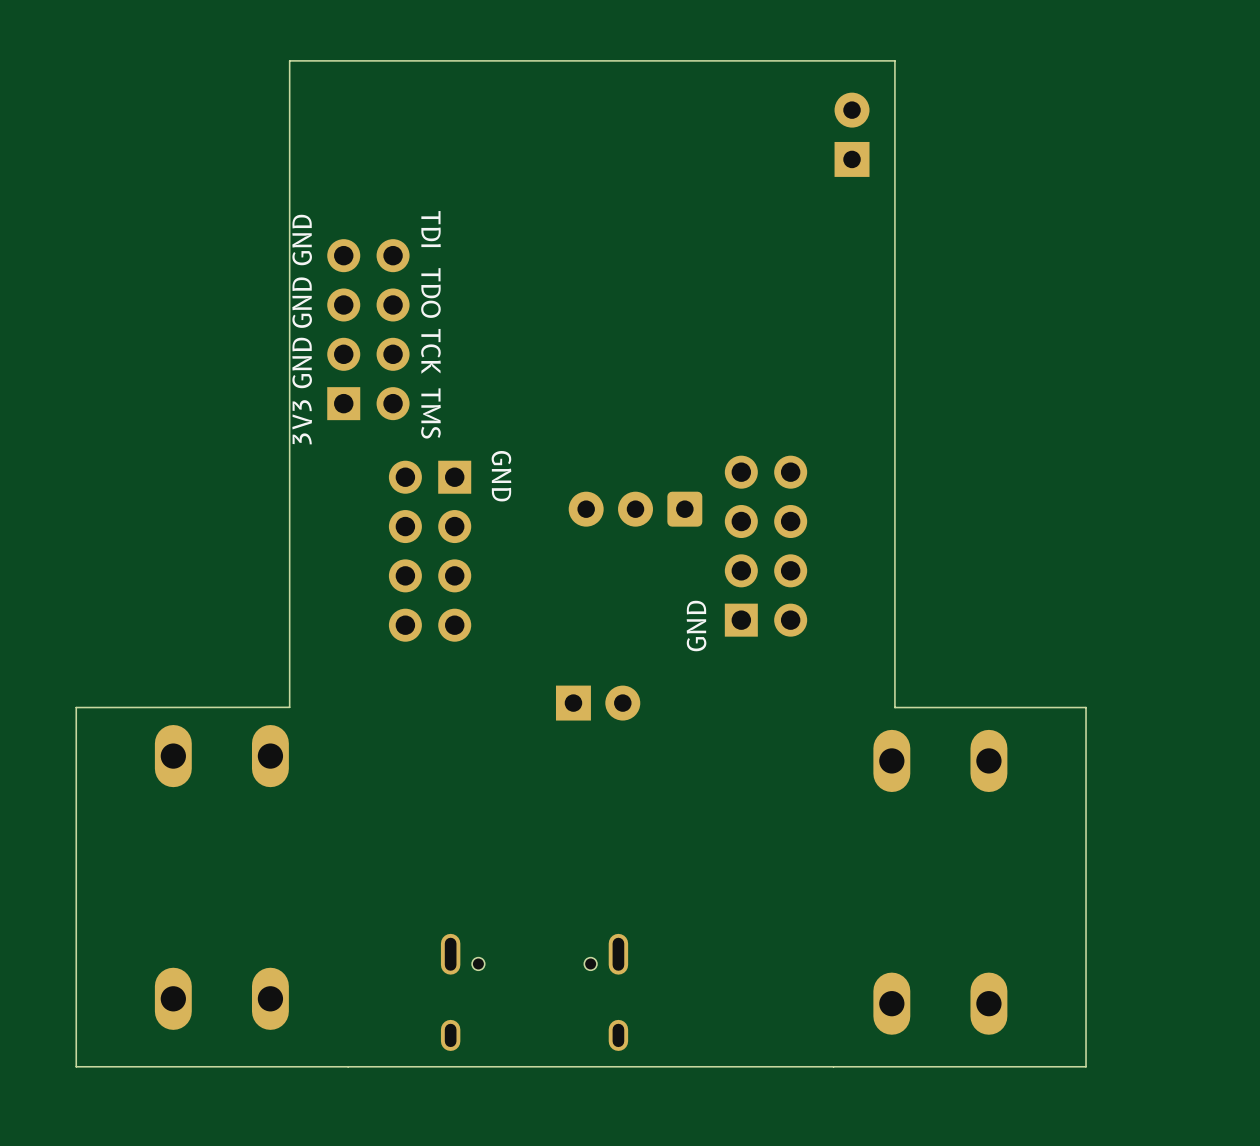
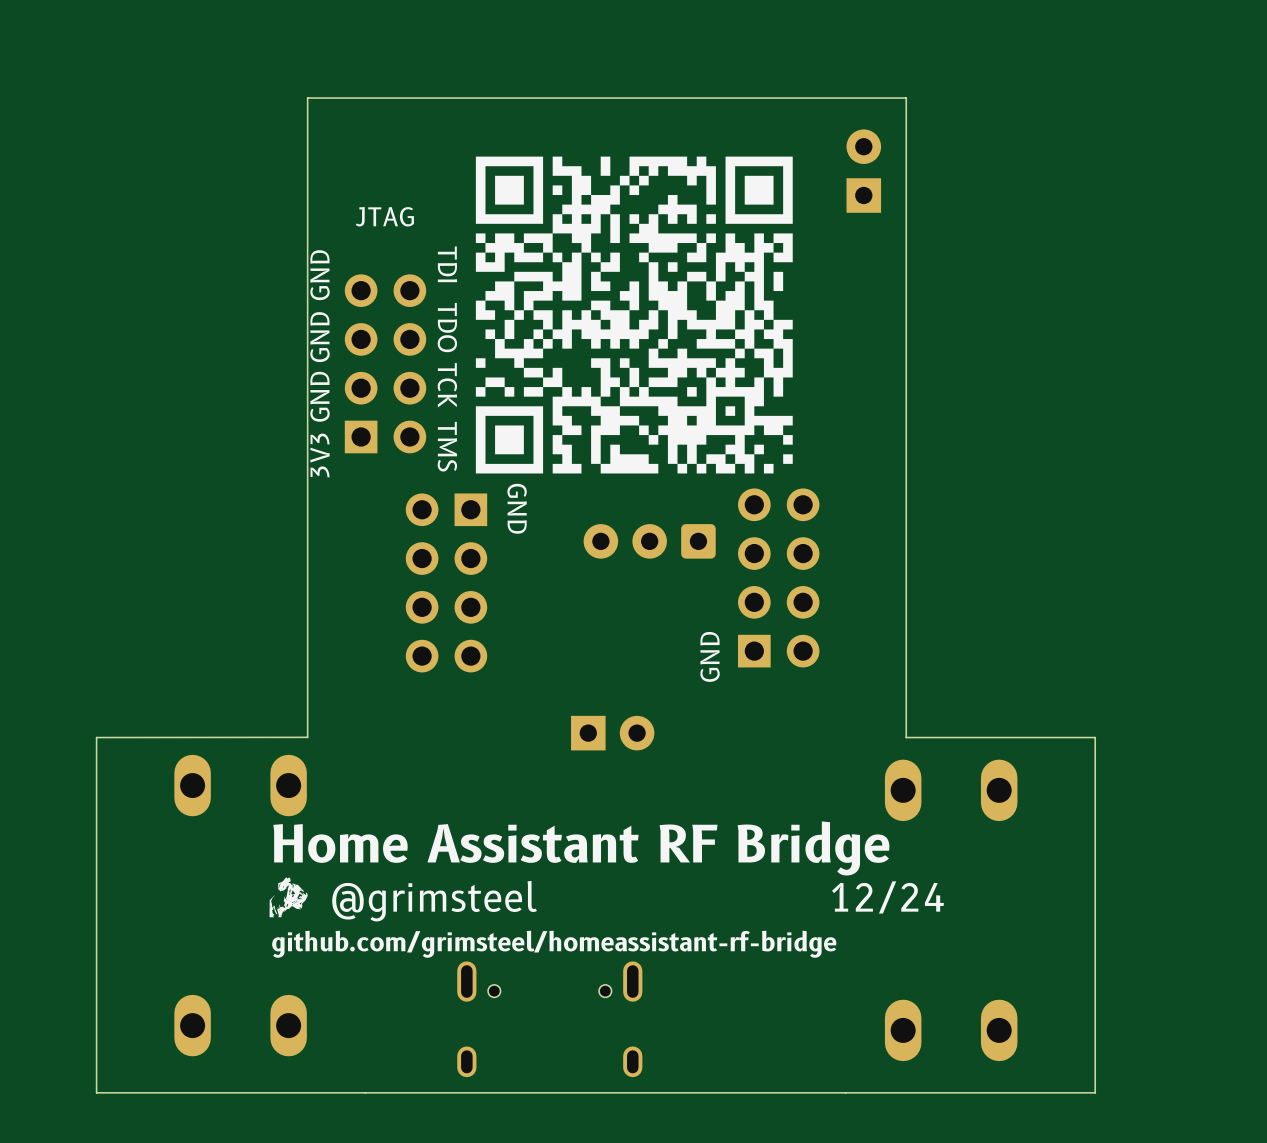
drawing: none -> [475, 156, 793, 474]
text: none -> JTAG (384, 216)
text: none -> Home Assistant RF Bridge (581, 848)
drawing: none -> [269, 877, 308, 918]
text: none -> 12/24 (887, 897)
text: none -> @grimsteel (434, 901)
text: none -> github.com/grimsteel/homeassistant-rf-bridge (554, 944)

